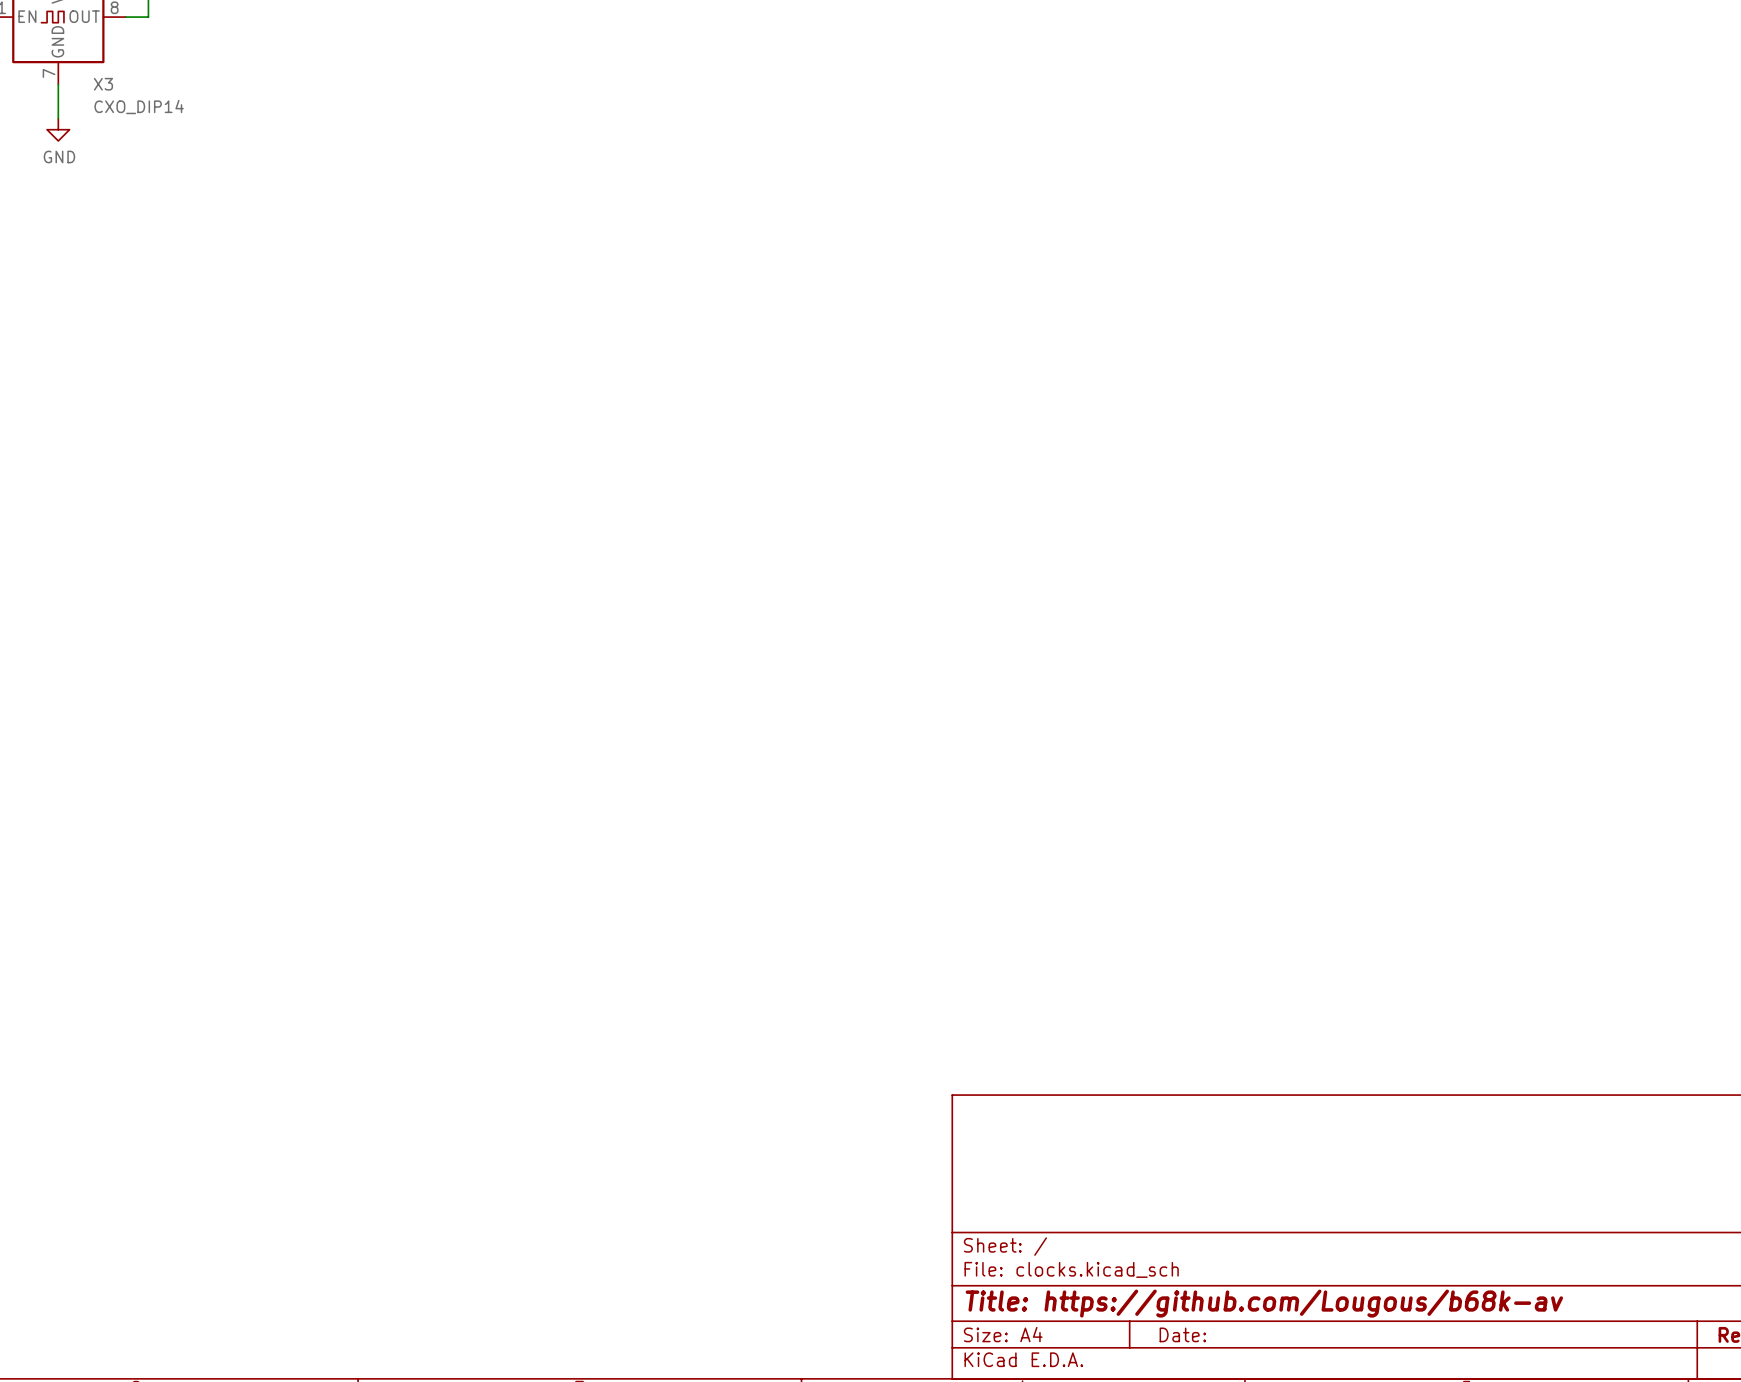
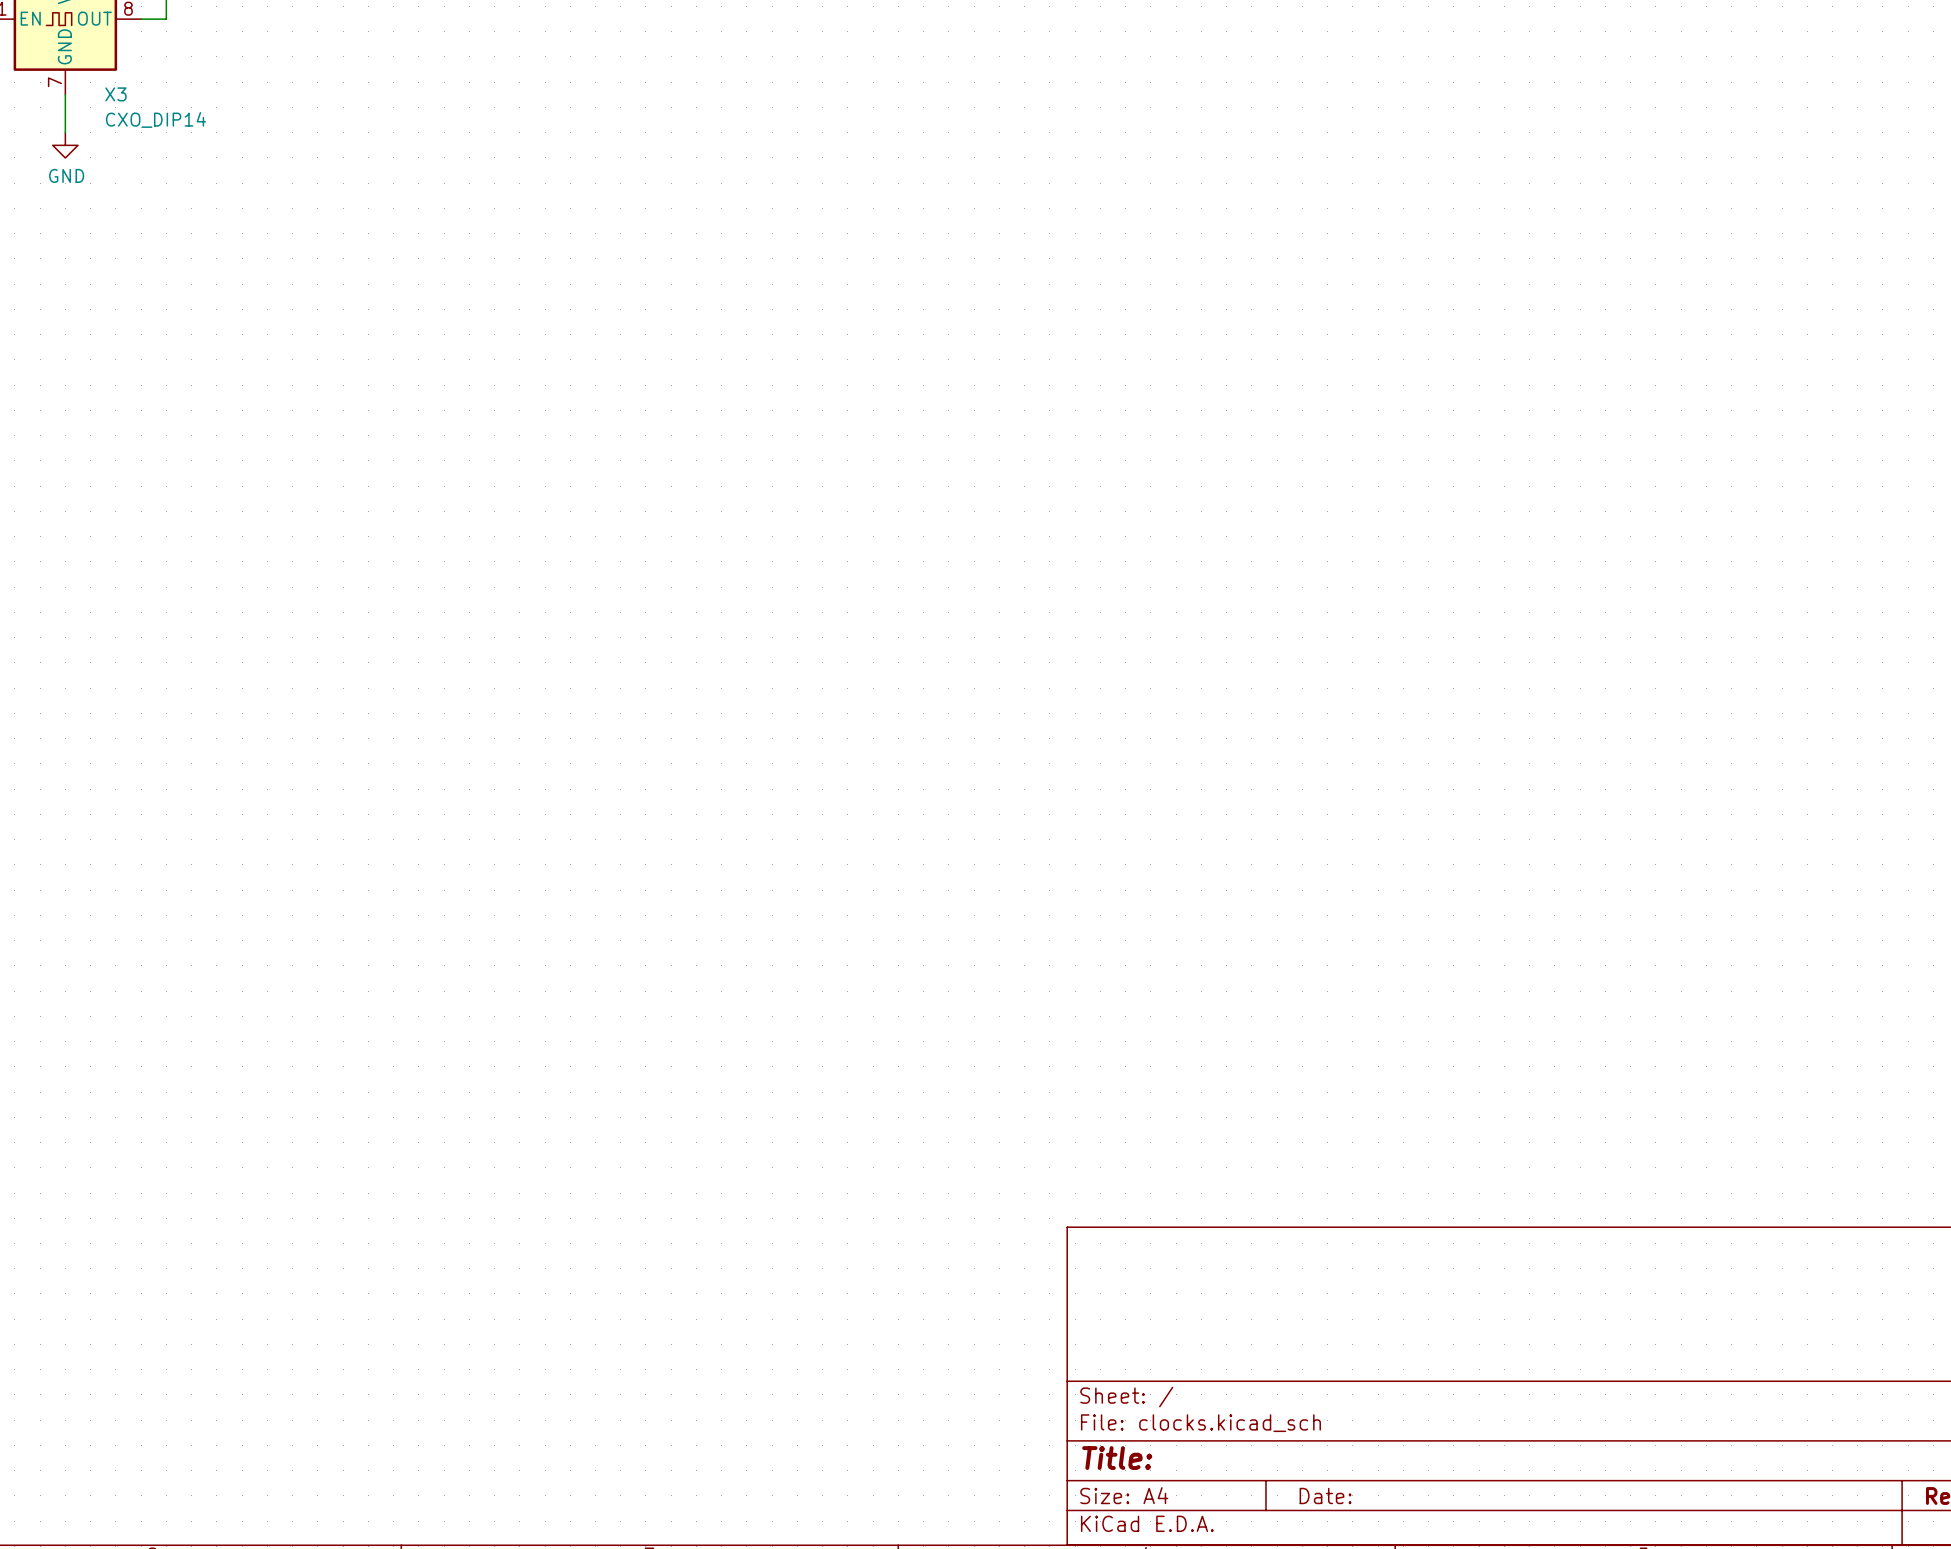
title block: Title: https://github.com/Lougous/b68k-av (1264, 1303) -> Title: (1117, 1458)

